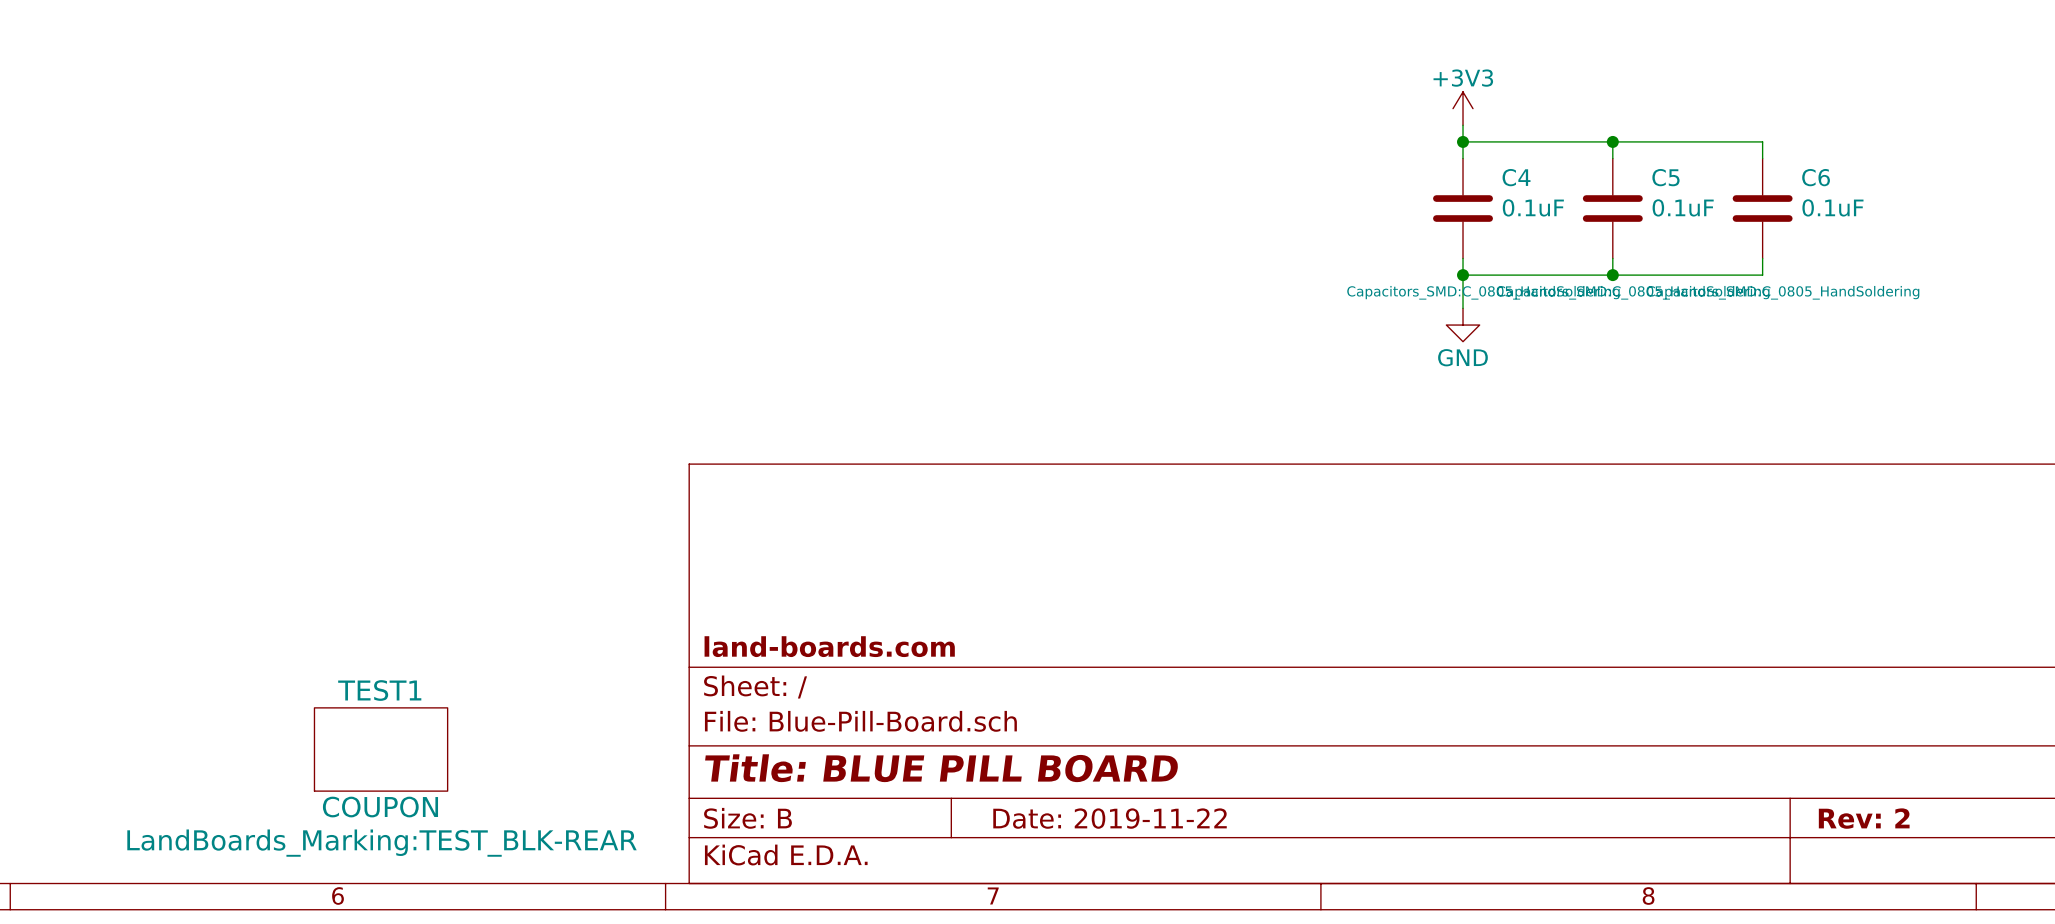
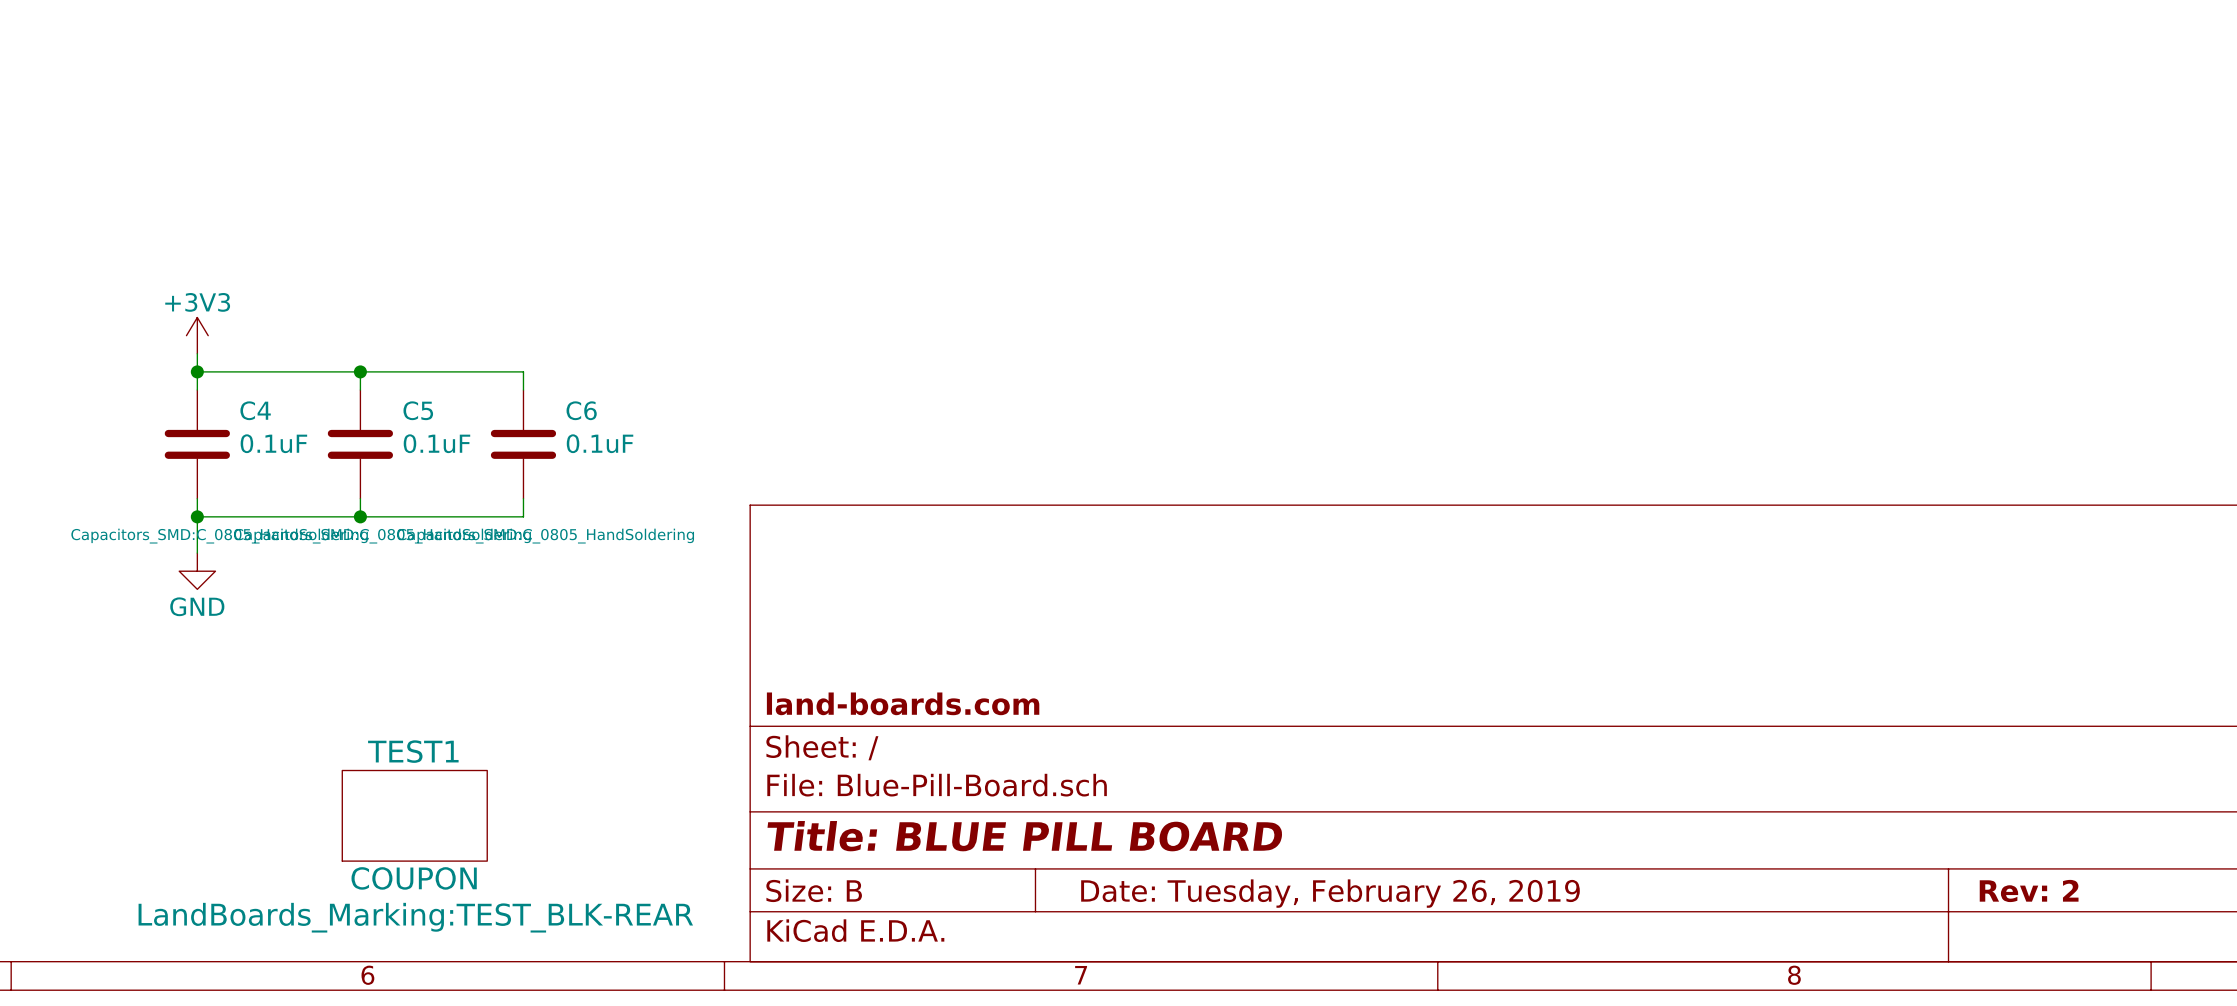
power symbol: +3V3 (1463, 108) -> none
wire: (1463, 125) (1463, 158) -> none
wire: (1463, 141) (1762, 141) (1762, 158) -> none
junction: (1463, 141) -> none
wire: (1612, 141) (1612, 158) -> none
junction: (1612, 141) -> none
C4 position: (1463, 208) -> (197, 444)
C5 position: (1612, 208) -> (360, 444)
C6 position: (1762, 208) -> (523, 444)
wire: (1463, 258) (1463, 308) -> none
wire: (1612, 258) (1612, 275) -> none
wire: (1762, 258) (1762, 275) (1463, 275) -> none
junction: (1463, 275) -> none
junction: (1612, 275) -> none
power symbol: none -> +3V3 (197, 335)
wire: none -> (197, 353) (197, 390)
power symbol: GND (1463, 325) -> none
wire: none -> (197, 371) (523, 371) (523, 390)
junction: none -> (197, 371)
wire: none -> (360, 371) (360, 390)
junction: none -> (360, 371)
wire: none -> (197, 498) (197, 553)
wire: none -> (360, 498) (360, 516)
wire: none -> (523, 498) (523, 516) (197, 516)
junction: none -> (197, 516)
junction: none -> (360, 516)
power symbol: none -> GND (197, 571)
title block: Date: 2019-11-22 (1110, 818) -> Date: Tuesday, February 26, 2019 (1330, 893)

